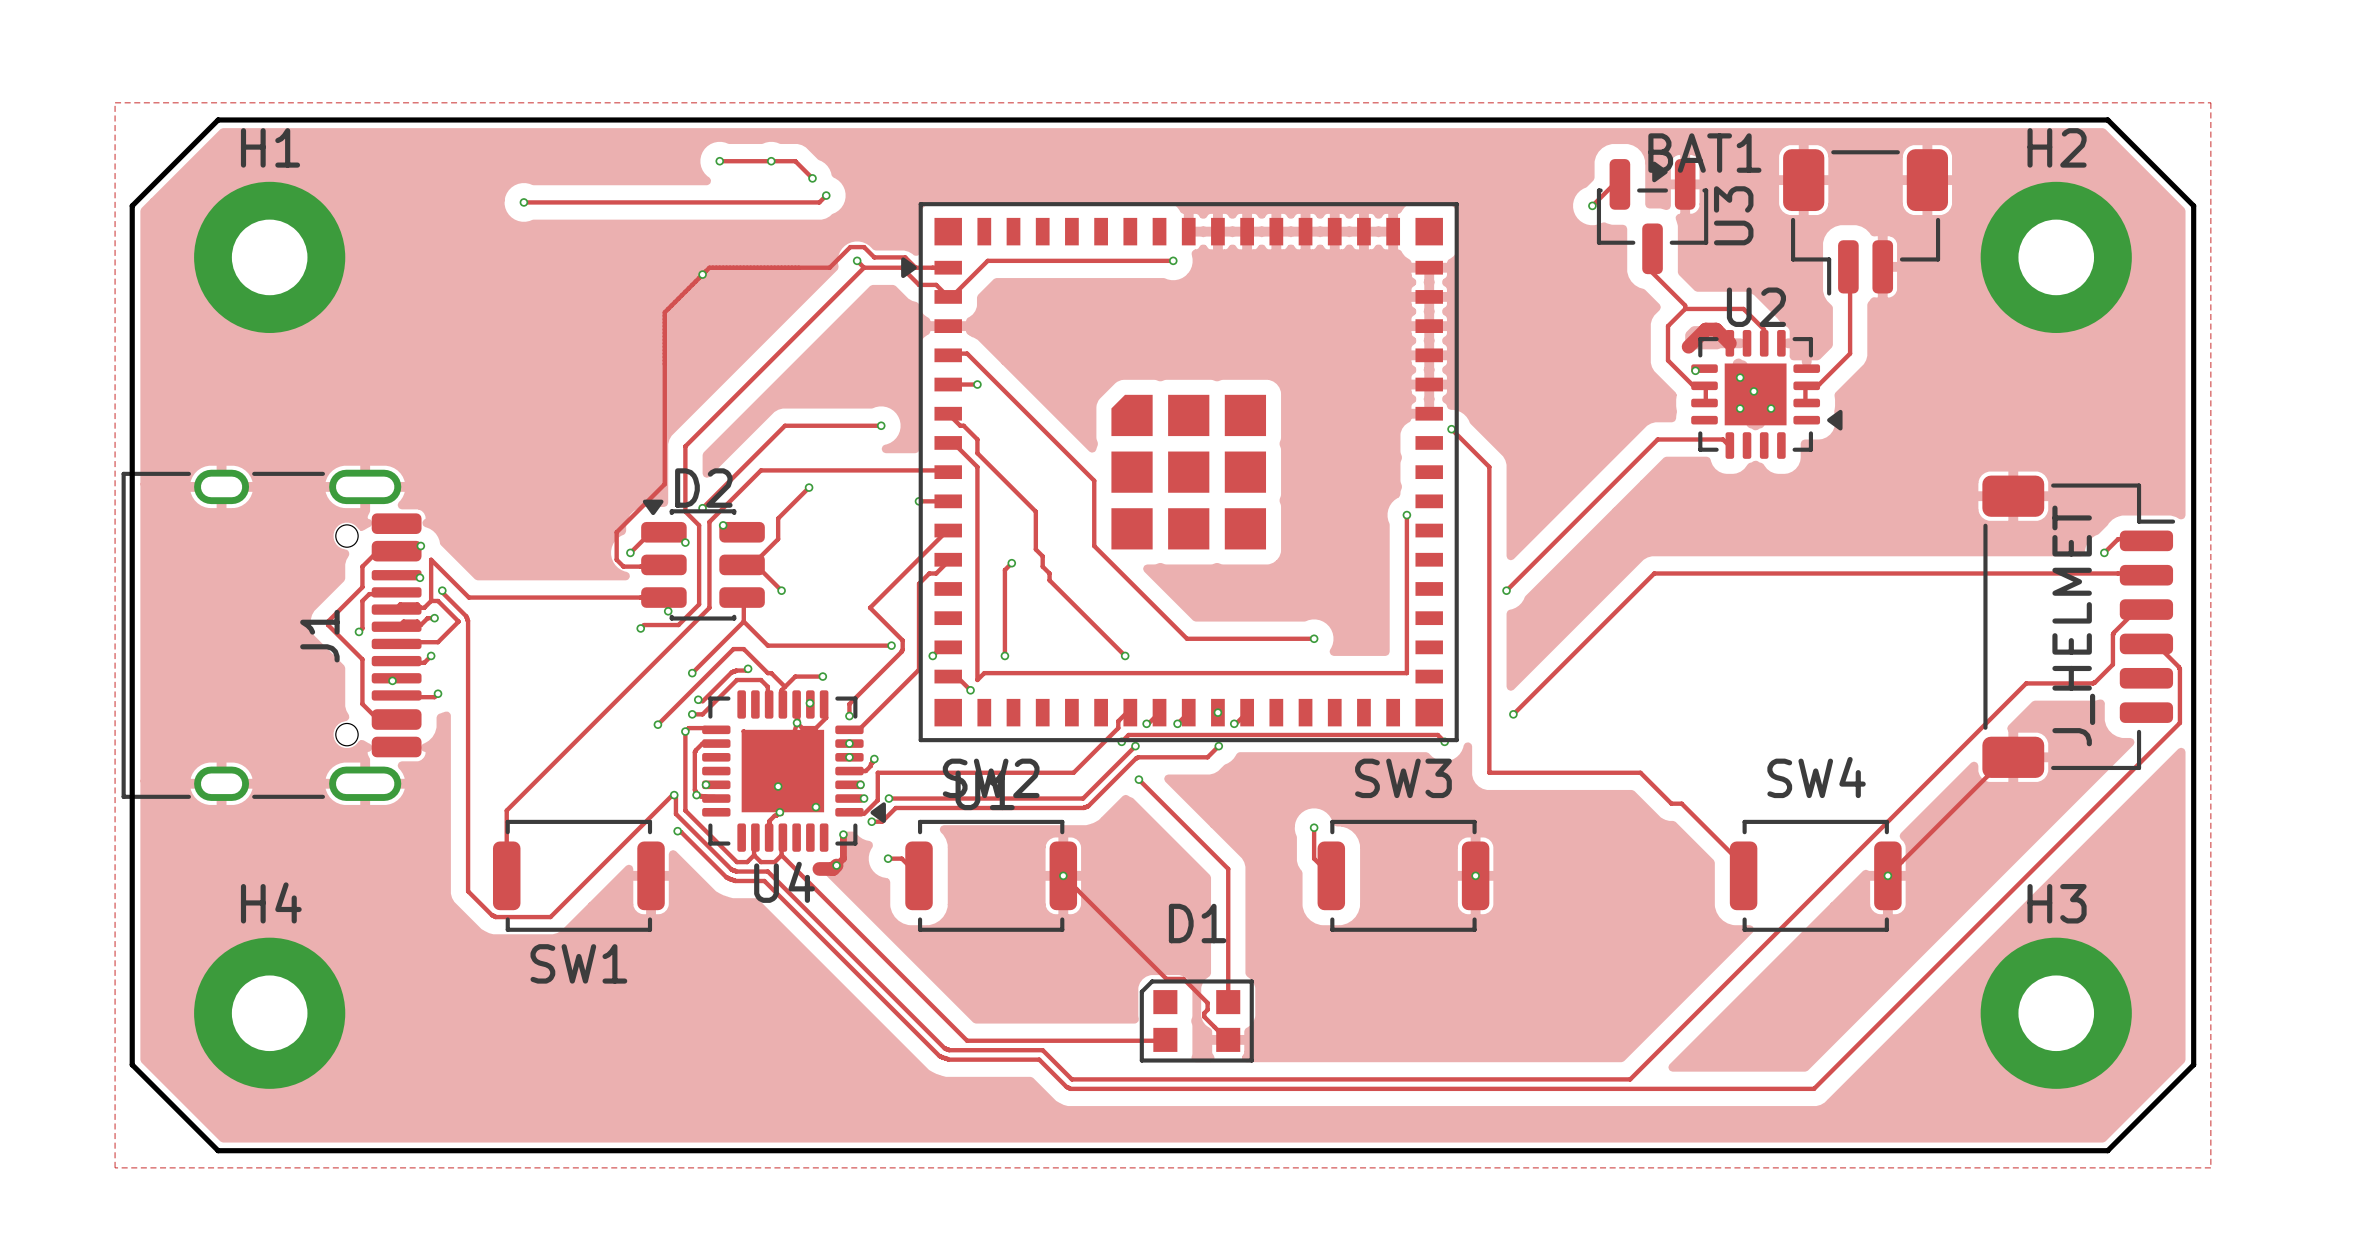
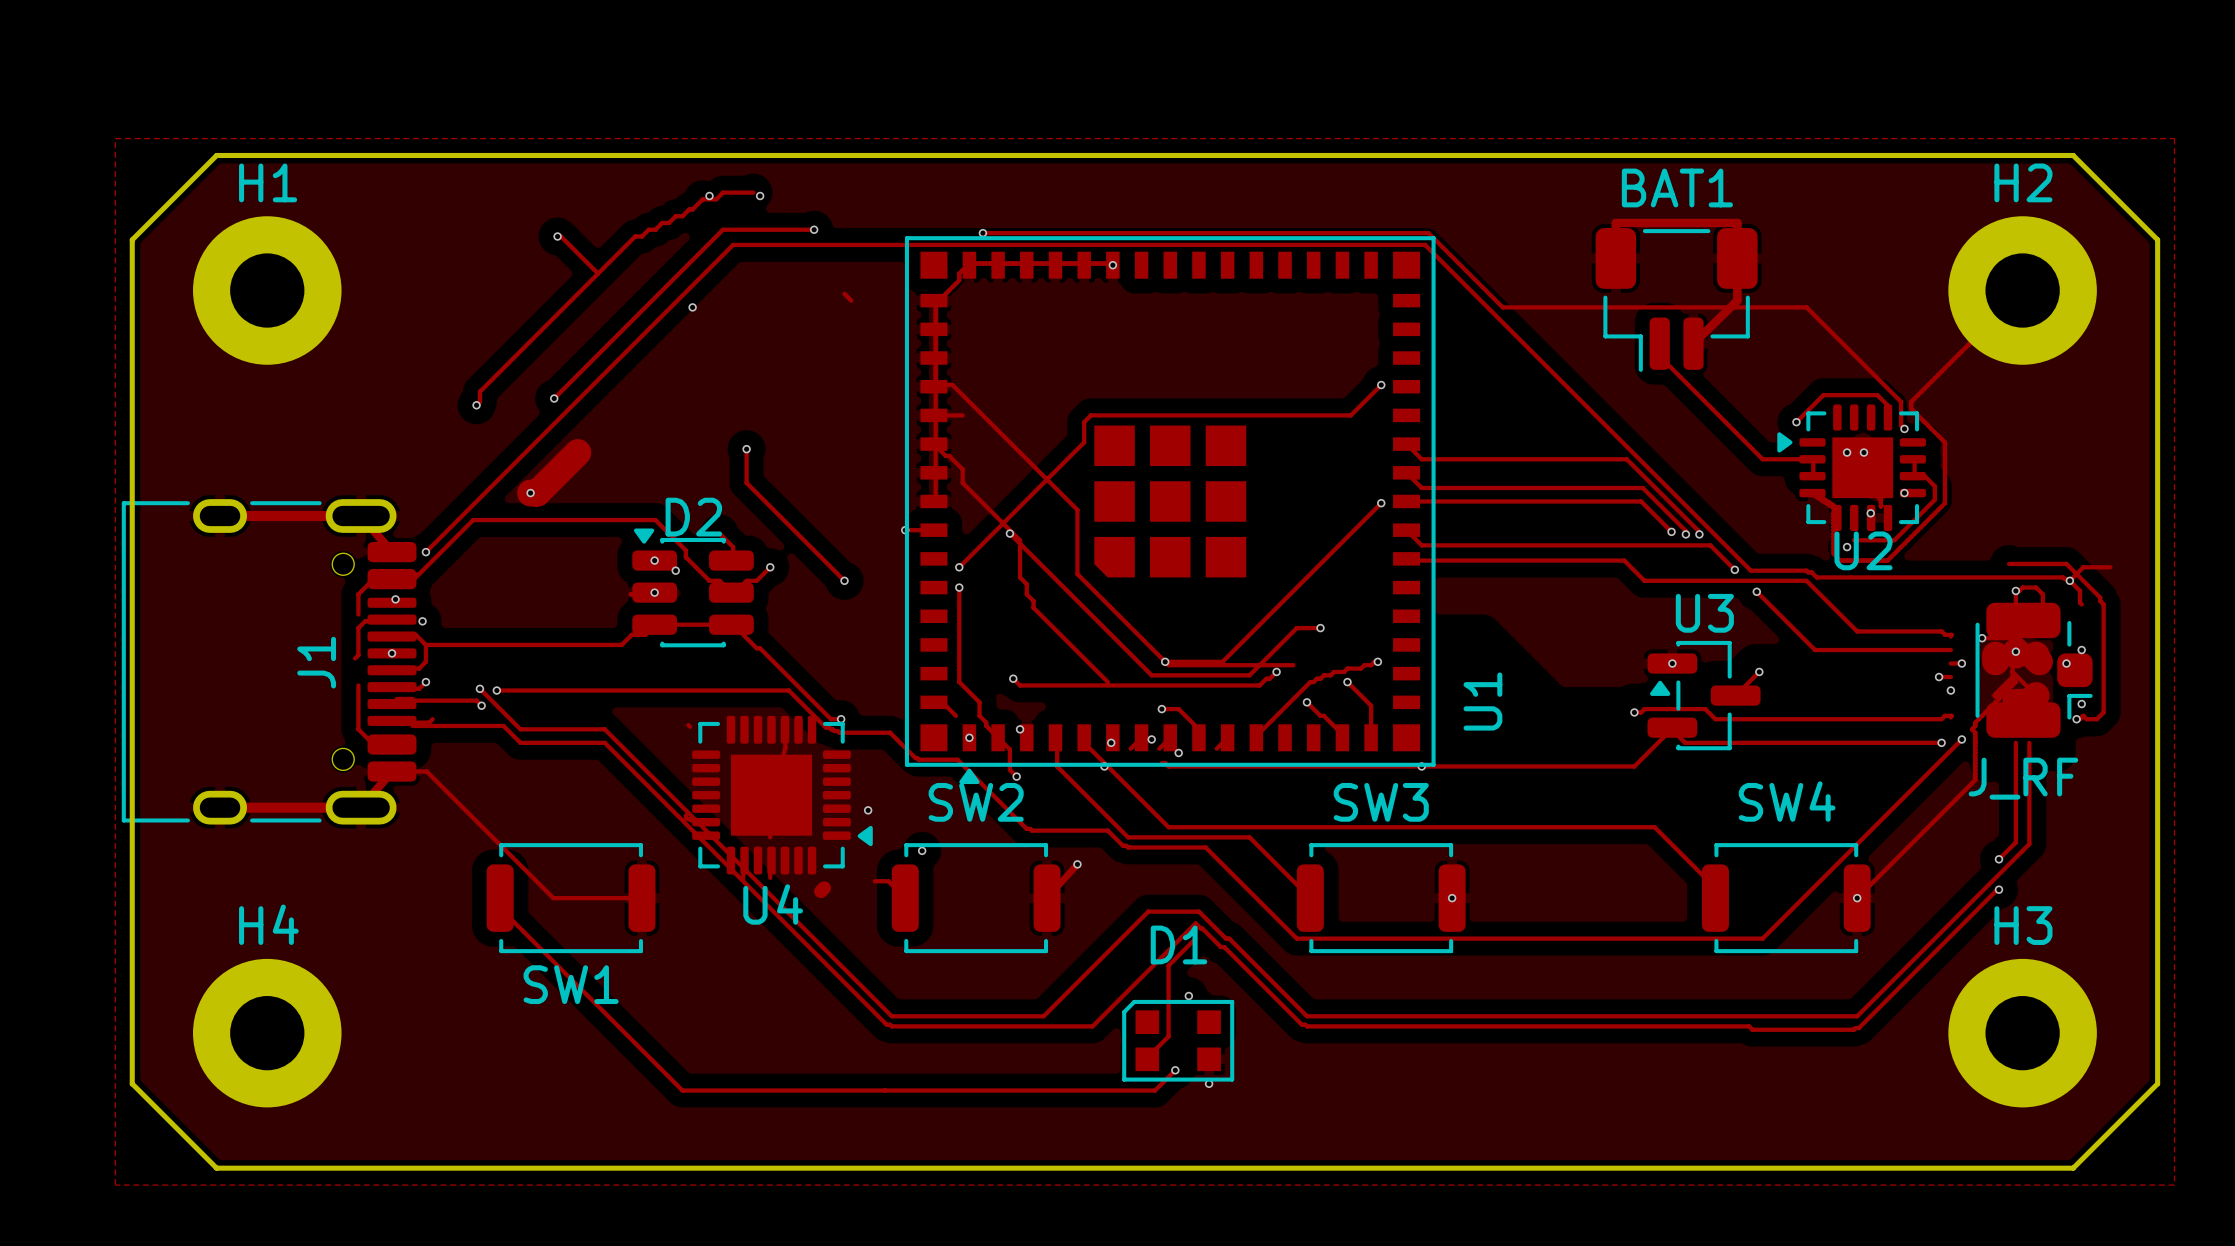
track: (719, 161) (795, 161) (812, 178) -> none
via: (812, 178) -> none
track: (1613, 185) (1592, 205) -> none
track: (826, 195) (819, 202) (651, 202) -> (753, 192) (722, 192) (716, 199) (702, 199) (682, 216) (675, 216) (668, 223) (662, 223) (655, 229) (648, 229) (641, 236)
track: none -> (814, 229) (722, 229) (554, 398)
track: none -> (982, 233) (1428, 233) (1502, 307) (1806, 307) (1901, 401) (1901, 425) (1904, 428)
via: none -> (982, 233)
track: (523, 202) (565, 202) -> none
via position: (523, 202) -> (557, 236)
track: (568, 202) (644, 202) -> (560, 236) (598, 273)
track: none -> (635, 236) (479, 391) (479, 401) (476, 405)
via: (1592, 205) -> none
U3 rotation: 0° (1652, 216) -> 90° counterclockwise (1704, 695)
U3 position: (1652, 216) -> (1704, 695)
BAT1 position: (1865, 222) -> (1676, 299)
track: none -> (1615, 258) (1615, 223) (1737, 223) (1737, 300) (1693, 343)
track: none -> (969, 263) (1111, 263) (1112, 265)
track: none -> (969, 263) (959, 273) (959, 280) (939, 300) (933, 300)
via: (857, 260) -> none
track: (1173, 260) (987, 260) (949, 298) -> none
via position: (1173, 260) -> (1112, 265)
track: none -> (2019, 293) (2022, 290) (1911, 401) (1911, 408) (1944, 442) (1944, 503) (1887, 560) (1840, 560) (1833, 553) (1833, 506) (1812, 493)
track: (939, 267) (915, 267) (905, 257) (874, 257) (864, 247) (850, 247) (829, 267) (709, 267) (664, 312) (664, 484) (616, 532) (616, 559) (623, 566) (639, 566) -> none
track: none -> (935, 300) (935, 499) (933, 501)
track: (1850, 267) (1850, 353) (1819, 384) (1805, 384) (1805, 401) -> none
track: (1650, 271) (1685, 305) (1685, 308) -> none
track: (948, 296) (936, 284) (919, 284) (901, 267) (864, 267) (685, 446) (685, 511) -> (371, 580) (412, 580) (473, 520) (655, 520) (675, 540)
track: (1685, 308) (1743, 308) (1764, 329) -> none
track: (1685, 308) (1668, 326) (1668, 360) (1692, 384) (1705, 384) (1705, 401) -> none
track: none -> (1659, 343) (1658, 344) (1658, 354) (1762, 459) (1813, 459) (1812, 476)
track: (1729, 343) (1716, 329) (1705, 329) (1688, 346) -> none
track: none -> (1381, 385) (1350, 415) (1090, 415) (1084, 422) (1084, 442) (959, 567)
via: none -> (1381, 385)
via: none -> (554, 398)
via: (1695, 370) -> none
via: none -> (476, 405)
via: (1740, 377) -> none
via: (977, 384) -> none
track: none -> (1888, 417) (1887, 405) (1877, 395) (1823, 395) (1796, 422)
via: (1753, 391) -> none
via: none -> (1796, 422)
U2 rotation: 0° (1766, 394) -> 180° (1851, 467)
U2 position: (1766, 394) -> (1851, 467)
via: none -> (1904, 428)
via: (1740, 408) -> none
via: (1771, 408) -> none
track: none -> (1406, 444) (1421, 459) (1626, 459) (1699, 531) (1699, 534)
track: none -> (746, 449) (746, 482) (844, 580)
via: none -> (746, 449)
track: none -> (577, 452) (537, 493) (530, 493)
via: none -> (1847, 452)
via: none -> (1863, 452)
track: (881, 425) (785, 425) (702, 508) -> none
via: (881, 425) -> none
track: (1451, 429) (1489, 466) (1489, 772) (1640, 772) (1671, 803) -> (1084, 736) (1084, 742) (1168, 827) (1644, 827)
via: (1451, 429) -> none
track: none -> (1912, 459) (1914, 459) (1914, 476)
track: (953, 442) (977, 466) (977, 680) (984, 673) (1406, 673) (1406, 515) -> none
track: none -> (1406, 472) (1421, 487) (1642, 487) (1685, 531) (1685, 534)
track: (1729, 446) (1722, 439) (1657, 439) (1506, 590) -> none
track: none -> (1912, 476) (1924, 476) (1934, 486) (1934, 499) (1894, 540) (1853, 540)
via: none -> (530, 493)
via: none -> (1904, 493)
track: none -> (1876, 495) (1880, 499) (1881, 505)
track: (949, 470) (760, 470) (709, 521) (709, 607) (506, 810) (506, 875) -> (1175, 1070) (1155, 1090) (682, 1090) (500, 908) (500, 898)
U1 rotation: 0° (1179, 472) -> 90° counterclockwise (1170, 510)
track: none -> (1406, 501) (1641, 501) (1671, 531)
track: none -> (1381, 503) (1222, 661) (1165, 661)
via: none -> (1381, 503)
via: none -> (1870, 513)
track: none -> (220, 516) (361, 516) (392, 552)
track: (809, 487) (778, 518) (778, 539) (754, 563) (781, 590) -> none
via: (809, 487) -> none
track: none -> (1406, 530) (1421, 545) (1710, 545) (1734, 569)
via: none -> (1671, 531)
track: none -> (719, 533) (733, 547) (733, 560) (731, 560)
track: none -> (1009, 533) (1151, 675) (1249, 675) (1296, 628) (1320, 628)
via: none -> (1009, 533)
via: none -> (1685, 534)
via: none -> (1699, 534)
via: (702, 508) -> none
via: (1406, 515) -> none
via: none -> (1847, 547)
track: (695, 521) (699, 525) (699, 604) (678, 625) (644, 625) (640, 628) -> (685, 550) (685, 557) (709, 580) (719, 580) (733, 594) (746, 580) (756, 580) (770, 567)
track: none -> (425, 552) (733, 244) (1425, 244) (1750, 570) (1806, 570) (1816, 577) (2063, 577) (2068, 579) (2080, 590) (2081, 604)
via: none -> (425, 552)
via: (723, 525) -> none
track: (947, 530) (870, 607) (902, 640) (902, 649) (849, 704) (849, 716) -> none
track: none -> (1406, 558) (1408, 560) (1624, 560) (1644, 580) (1806, 580) (1857, 631) (1941, 631) (1944, 634) (1951, 634) (1950, 636)
track: (651, 532) (630, 552) -> none
via: none -> (654, 560)
track: none -> (2009, 563) (2066, 563) (2100, 597) (2100, 601) (2103, 604) (2103, 712) (2096, 719) (2086, 719) (2083, 715) (2080, 719) (2076, 719)
via: none -> (770, 567)
via: none -> (959, 567)
via: none -> (1734, 569)
via: (420, 546) -> none
via: (630, 552) -> none
via: none -> (844, 580)
track: (949, 559) (936, 573) (929, 573) (919, 583) (919, 669) (860, 728) -> none
track: none -> (959, 587) (959, 682) (979, 702) (979, 715) (986, 722) (986, 725) (1009, 749) (1009, 769) (1016, 776)
via: none -> (959, 587)
track: (1011, 563) (1004, 570) (1004, 655) -> none
via: (1011, 563) -> none
via: none -> (2015, 590)
via: none -> (654, 592)
track: none -> (1756, 591) (1815, 650) (1950, 650)
via: none -> (1756, 591)
via: none -> (395, 599)
track: (2145, 573) (1654, 573) (1513, 714) -> none
via: (419, 577) -> none
track: none -> (2015, 611) (2015, 590) (2019, 590) (2022, 587) (2036, 587) (2042, 594) (2042, 611)
track: (362, 587) (328, 621) (328, 625) (362, 659) -> none
via: (442, 590) -> none
via: (781, 590) -> none
via: (1506, 590) -> none
track: (442, 592) (466, 616) (468, 620) (468, 891) (492, 915) (495, 917) (550, 917) (672, 795) -> none
via: none -> (422, 621)
track: (643, 597) (468, 597) (431, 559) (431, 600) -> none
track: none -> (654, 624) (733, 624) (756, 648) (760, 648) (831, 719) (841, 719)
track: none -> (655, 624) (645, 634) (631, 634) (621, 644) (429, 644)
track: (743, 597) (743, 621) -> none
track: (431, 600) (438, 600) (458, 621) (438, 642) (424, 642) -> (392, 636) (392, 634) (415, 634) (425, 644) (425, 661) (419, 668)
track: (431, 600) (424, 607) (420, 607) (417, 604) (400, 604) (396, 607) -> none
via: none -> (1320, 628)
track: (2136, 609) (2113, 632) (2112, 664) (2094, 682) (2026, 683) (1630, 1079) (1071, 1079) (1042, 1050) (949, 1050) (944, 1048) (767, 871) (736, 871) (731, 869) (675, 813) (675, 796) (674, 795) -> none
via: (668, 611) -> none
via: none -> (1982, 638)
track: none -> (1985, 638) (2019, 638) (2036, 655) (2036, 658) (2039, 661)
track: (431, 618) (427, 618) (420, 625) (417, 621) (403, 621) (396, 628) -> none
via: (434, 618) -> none
track: (743, 621) (767, 645) (891, 645) -> none
track: (743, 621) (692, 673) -> none
track: none -> (1995, 648) (1995, 661)
via: none -> (2081, 650)
track: none -> (2015, 651) (2015, 655)
via: none -> (2015, 651)
via: none -> (392, 653)
J_HELMET: (2078, 626) -> none
via: (640, 628) -> none
via: (358, 631) -> none
via: none -> (1165, 661)
track: none -> (1377, 661) (1374, 661) (1371, 665) (1364, 665) (1360, 668) (1347, 668) (1344, 671) (1333, 671) (1330, 675) (1323, 675) (1320, 678) (1310, 682) (1256, 737)
via: none -> (1377, 661)
via: none -> (1672, 663)
track: none -> (1950, 663) (1961, 663)
via: none -> (1961, 663)
via: none -> (2066, 663)
via position: (1314, 638) -> (1276, 671)
track: none -> (2012, 665) (2012, 678)
J_RF: none -> (2034, 670)
track: (2155, 643) (2179, 668) (2179, 722) (1814, 1088) (1070, 1088) (1039, 1059) (948, 1059) (939, 1056) (764, 880) (735, 880) (726, 877) (679, 831) -> none
via: (891, 645) -> none
track: none -> (1276, 671) (1259, 685) (1020, 685) (1013, 678)
track: none -> (1759, 671) (1735, 695)
via: none -> (1759, 671)
track: none -> (2012, 671) (2036, 695) (2029, 702) (2015, 702)
track: none -> (1939, 677) (1950, 677)
via: none -> (1939, 677)
track: none -> (2016, 677) (2015, 675) (2015, 682) (1975, 722) (1975, 725) (1971, 729) (1975, 732) (1975, 779) (1958, 796)
track: none -> (2012, 678) (1995, 695) (2012, 678)
via: (932, 655) -> none
via position: (1004, 655) -> (1013, 678)
via: (1125, 655) -> none
track: none -> (1347, 682) (1371, 705) (1371, 737)
via: none -> (1347, 682)
track: none -> (479, 688) (520, 729) (604, 729) (891, 1016) (1043, 1016) (1148, 911) (1198, 911) (1225, 938) (1229, 938) (1306, 1016) (1857, 1016) (2029, 844) (2029, 742)
via: none -> (479, 688)
via: none -> (496, 690)
via: none -> (1950, 690)
track: (748, 668) (731, 672) (702, 701) -> none
via: (748, 668) -> none
via: (692, 673) -> none
track: (822, 676) (795, 676) (781, 690) (781, 704) -> none
via: (822, 676) -> none
track: none -> (1306, 702) (1320, 715) (1323, 715) (1340, 732) (1342, 737)
via: none -> (1306, 702)
track: none -> (392, 704) (397, 698) (412, 698) (414, 700) (476, 700) (481, 705)
via: none -> (2081, 704)
via: (392, 680) -> none
via: none -> (481, 705)
track: none -> (1161, 709) (1178, 709) (1198, 729) (1198, 737)
via: none -> (1161, 709)
track: (785, 686) (743, 649) (733, 649) (657, 724) -> none
track: none -> (1634, 712) (1641, 712) (1644, 709) (1705, 709) (1715, 719) (1941, 719) (1944, 715) (1951, 715) (1950, 717)
via: none -> (1634, 712)
via position: (970, 690) -> (969, 737)
via: (438, 693) -> none
via: none -> (841, 719)
via: none -> (2076, 719)
via: (698, 699) -> none
track: none -> (412, 725) (503, 725) (520, 742) (604, 742) (886, 1024) (891, 1026) (1092, 1026) (1195, 923) (1220, 947) (1224, 947) (1301, 1024) (1306, 1026) (1749, 1026) (1752, 1029) (1853, 1029) (1858, 1028) (1997, 889)
via: (809, 703) -> none
track: (767, 704) (767, 686) (760, 680) (736, 680) (702, 714) (692, 714) -> none
track: (796, 704) (798, 724) (802, 728) (815, 728) (826, 717) (822, 714) -> none
via: none -> (1020, 729)
track: none -> (1671, 729) (1685, 742) (1941, 742)
track: none -> (1671, 729) (1634, 766) (1168, 766) (1165, 763) (1161, 763)
track: (1128, 710) (1118, 721) (1118, 728) (1073, 772) (877, 772) (877, 800) (864, 813) -> none
via: (1217, 712) -> none
via: (692, 714) -> none
via: none -> (1151, 739)
via: (1513, 714) -> none
via: none -> (1961, 739)
via: (849, 716) -> none
via: none -> (1111, 742)
via: none -> (1941, 742)
track: none -> (2015, 742) (2015, 842) (1998, 859)
via: (797, 722) -> none
via: (1146, 723) -> none
via: (1177, 723) -> none
via: (1234, 723) -> none
via: (657, 724) -> none
track: (706, 728) (688, 728) (685, 731) (685, 810) (736, 862) (747, 862) (754, 855) (760, 862) (774, 862) (781, 855) (967, 1040) (1156, 1040) -> none
via: none -> (1178, 752)
via: (685, 731) -> none
track: (1121, 741) (1128, 734) (1437, 734) (1444, 741) -> none
track: (716, 743) (702, 743) (694, 752) (695, 790) -> none
via: (849, 743) -> none
track: (1135, 746) (1083, 798) (888, 798) -> none
via: (1135, 746) -> none
track: (1218, 746) (1207, 757) (1138, 757) (1086, 807) -> (1961, 739) (1762, 938) (1296, 938) (1205, 847) (1128, 847) (1123, 845) (1107, 830) (1069, 830)
via: (1218, 746) -> none
via: none -> (1016, 776)
via: (849, 757) -> none
track: (874, 759) (865, 771) (860, 771) -> none
via: (874, 759) -> none
track: (1138, 779) (1228, 868) (1228, 996) -> none
via: (1138, 779) -> none
track: none -> (220, 807) (361, 807) (392, 771) (426, 771) (553, 898) (641, 898)
via: (706, 784) -> none
via: (860, 784) -> none
via: (778, 786) -> none
via: none -> (868, 810)
via: (674, 795) -> none
via: (696, 795) -> none
via: (864, 798) -> none
via: (888, 798) -> none
via: (815, 807) -> none
track: (1084, 807) (895, 807) (882, 821) (871, 821) -> (1068, 830) (1026, 828) (957, 759) (918, 759) (890, 732) (839, 732) (825, 727) (788, 690) (496, 690)
track: (779, 812) (769, 820) (769, 826) -> none
via: (779, 812) -> none
via: (871, 821) -> none
via: none -> (922, 850)
track: (1314, 827) (1314, 858) -> (1055, 737) (1057, 736) (1057, 766) (1128, 837) (1249, 837) (1293, 881)
via: (1314, 827) -> none
via: (677, 831) -> none
track: (843, 834) (843, 858) (833, 868) -> none
via: (843, 834) -> none
via: none -> (1998, 859)
track: none -> (1077, 864) (1047, 898)
via: none -> (1077, 864)
via: (888, 858) -> none
via: (836, 865) -> none
via: none -> (1998, 889)
track: (833, 868) (819, 868) (833, 868) -> none
via: (1063, 875) -> none
track: (1073, 886) (1166, 978) (1183, 978) (1207, 1002) (1207, 1009) (1204, 1013) (1204, 1016) (1221, 1033) -> none
track: none -> (1195, 938) (1168, 965) (1168, 1036) (1147, 1059)
via: none -> (1188, 996)
via: none -> (1175, 1070)
via: none -> (1209, 1083)

